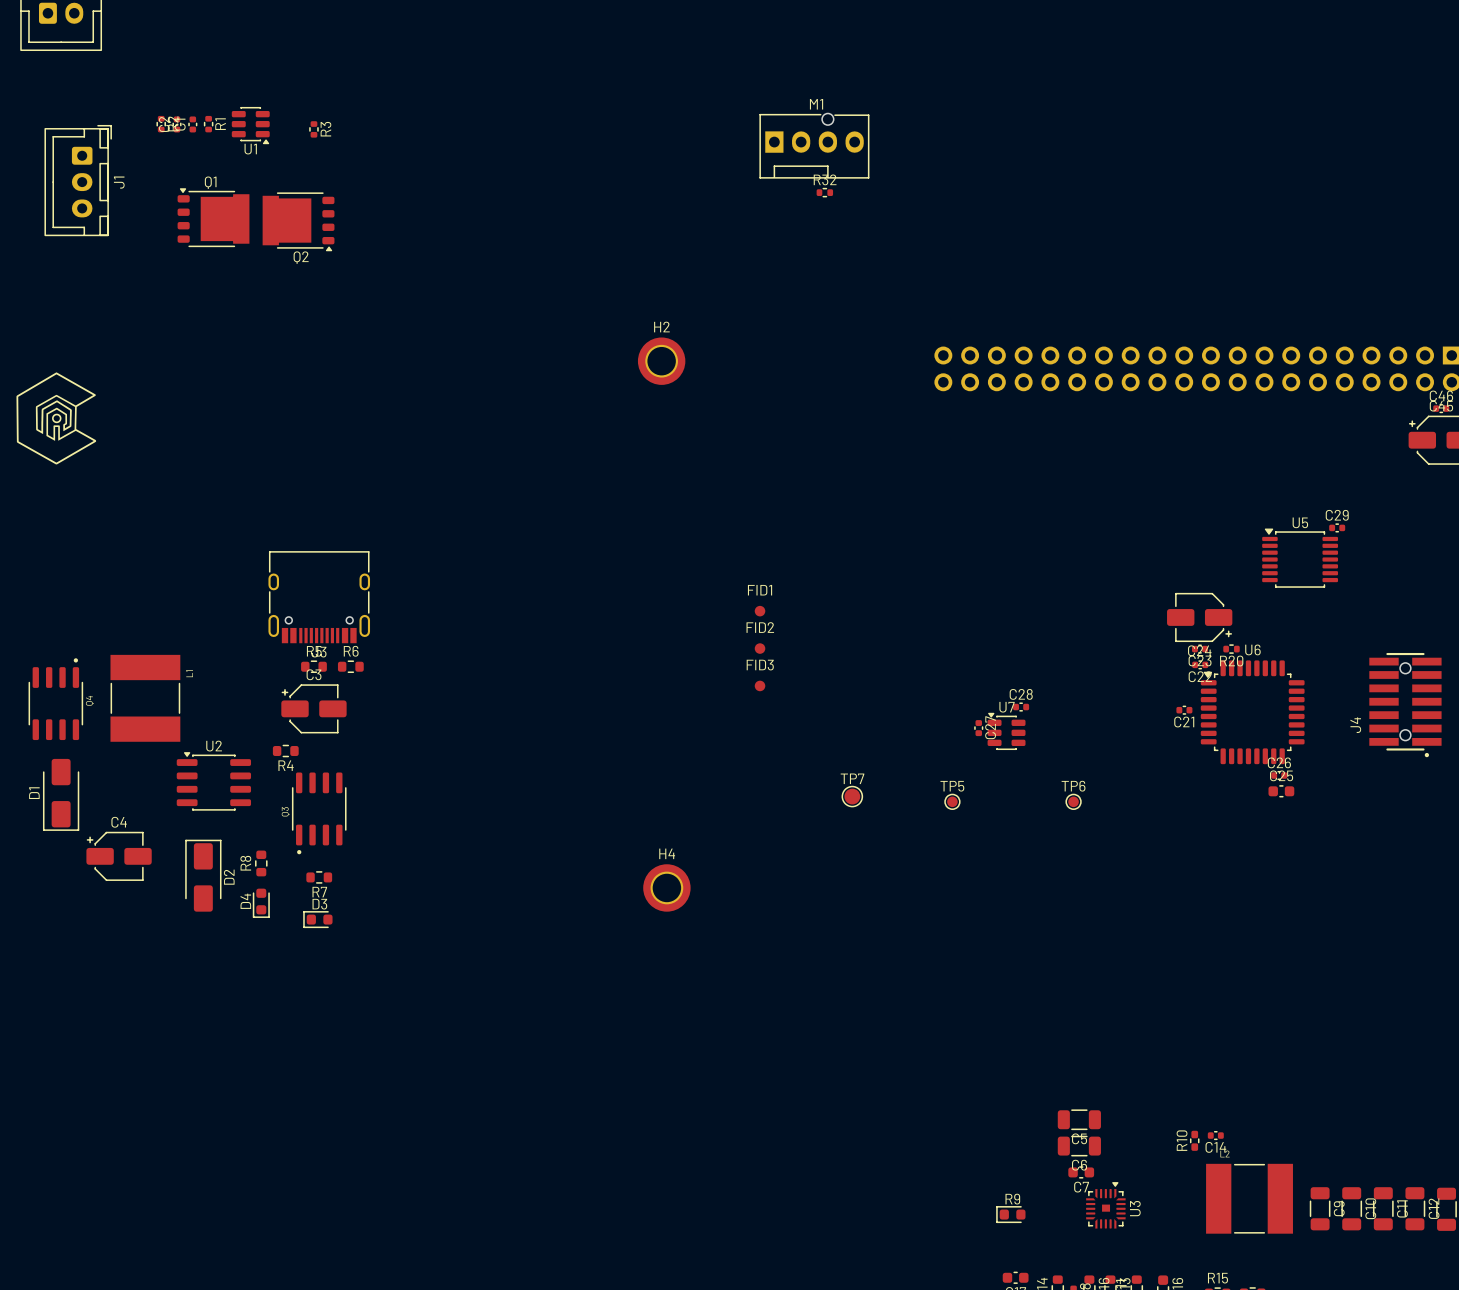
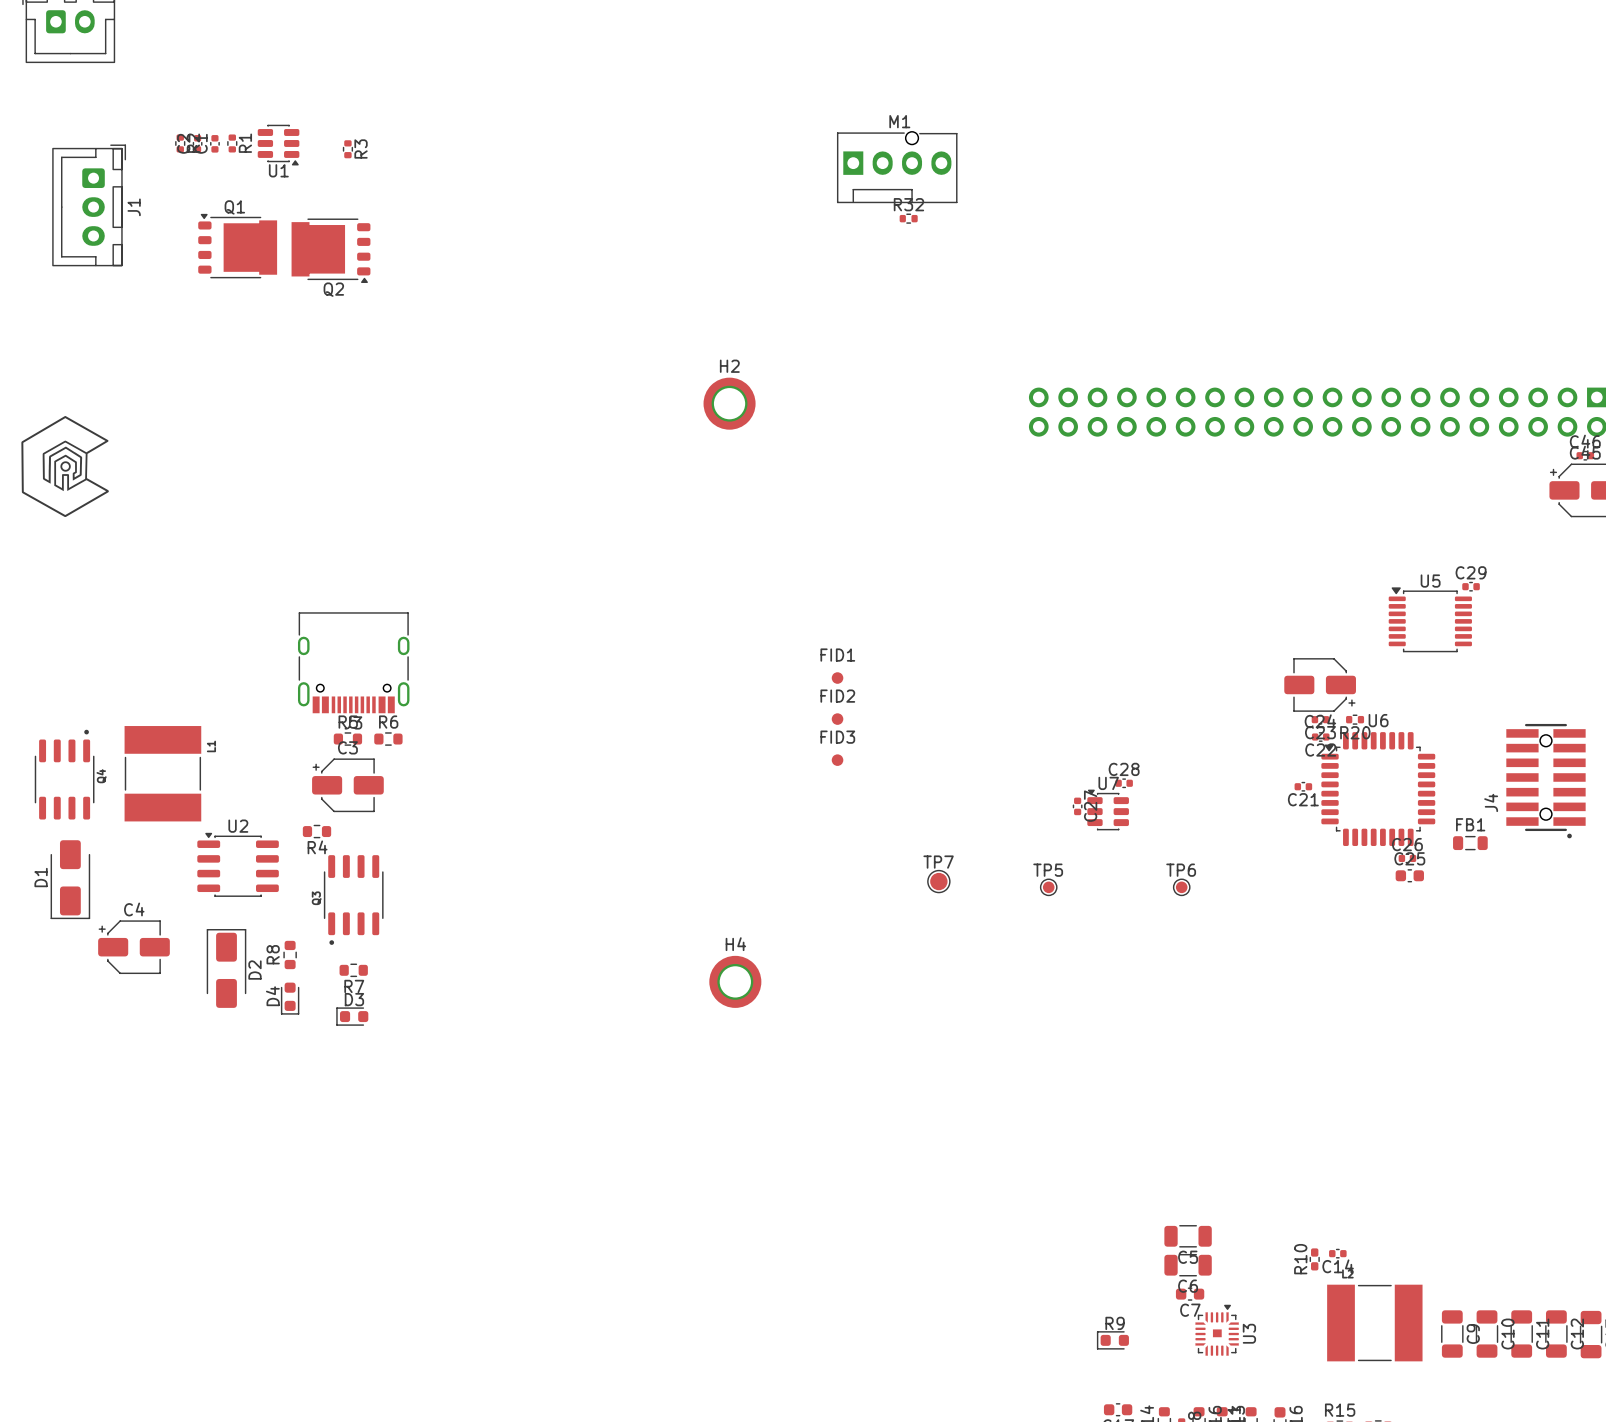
FB1: none -> (1470, 843)

